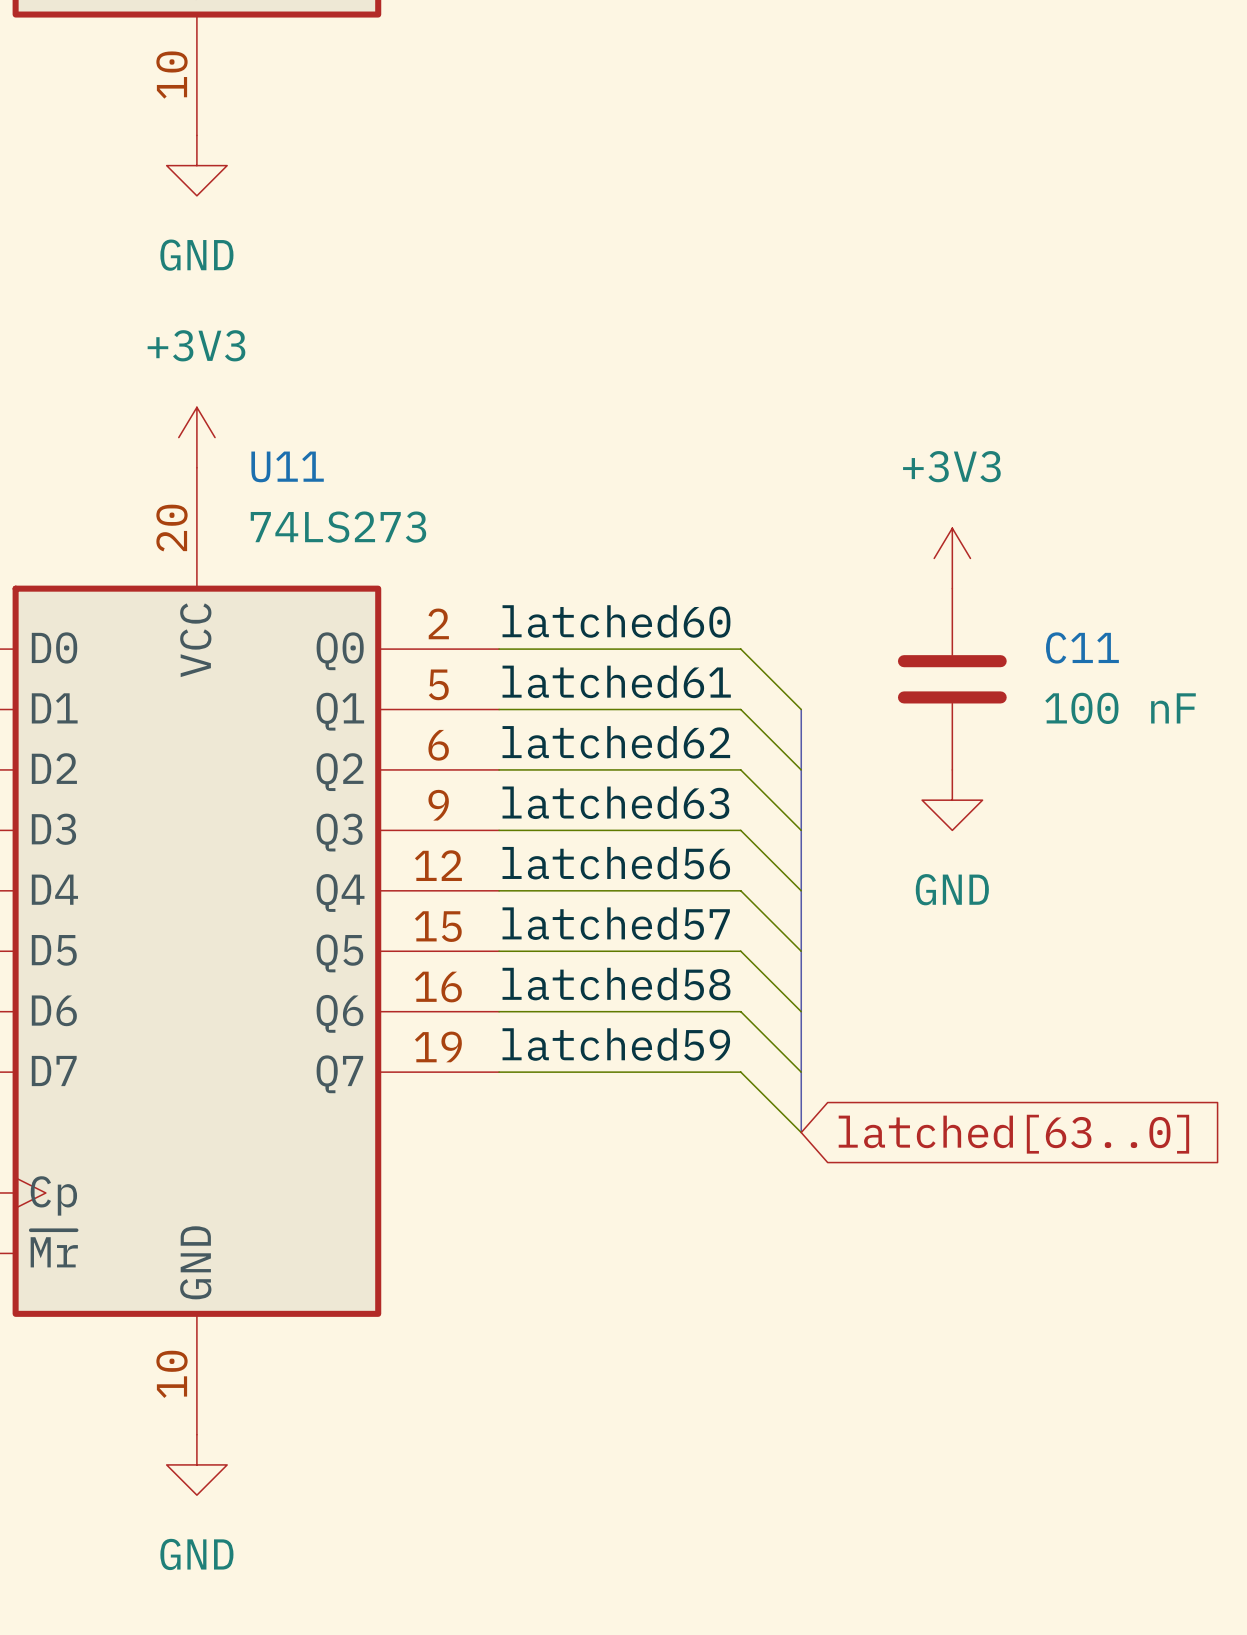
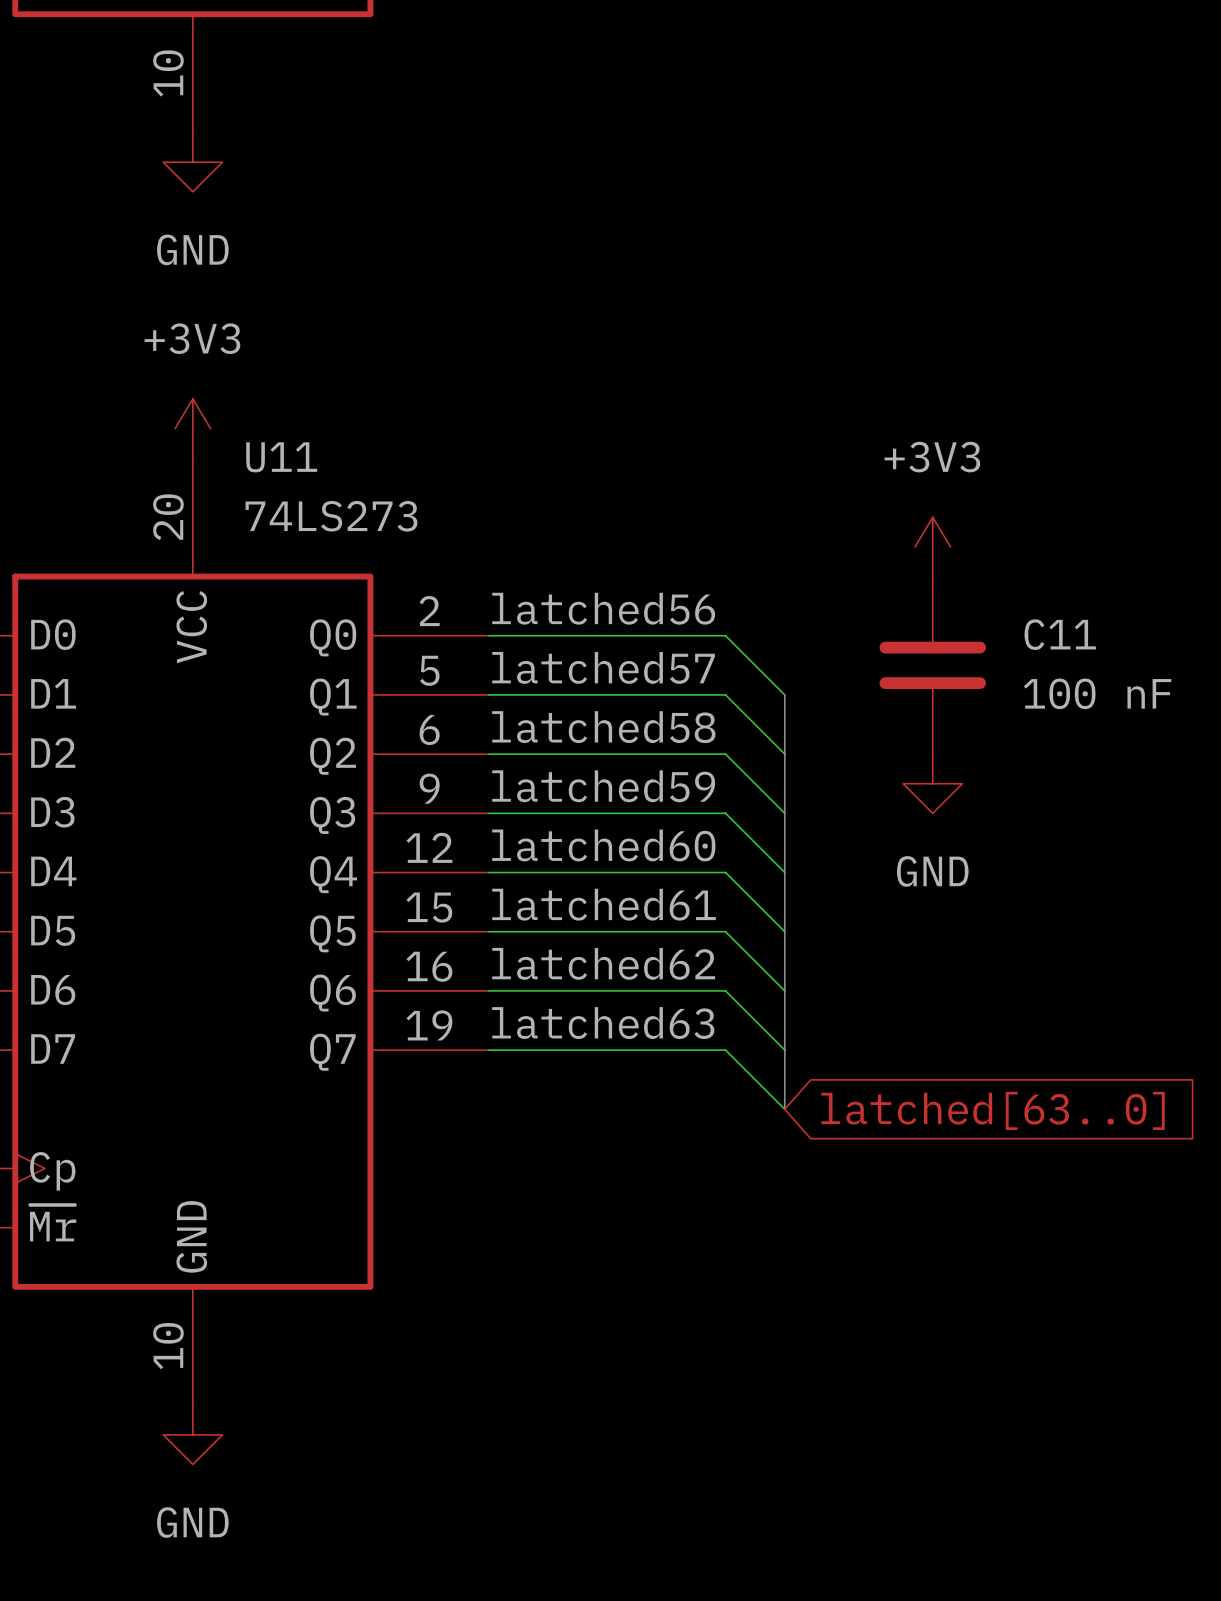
label: latched60 (616, 621) -> latched56 (603, 608)
label: latched61 (616, 681) -> latched57 (603, 667)
label: latched62 (616, 742) -> latched58 (603, 727)
label: latched63 (615, 802) -> latched59 (603, 786)
label: latched56 (616, 863) -> latched60 (603, 845)
label: latched57 (616, 923) -> latched61 (604, 904)
label: latched58 (616, 984) -> latched62 (603, 963)
label: latched59 (616, 1044) -> latched63 (603, 1023)

